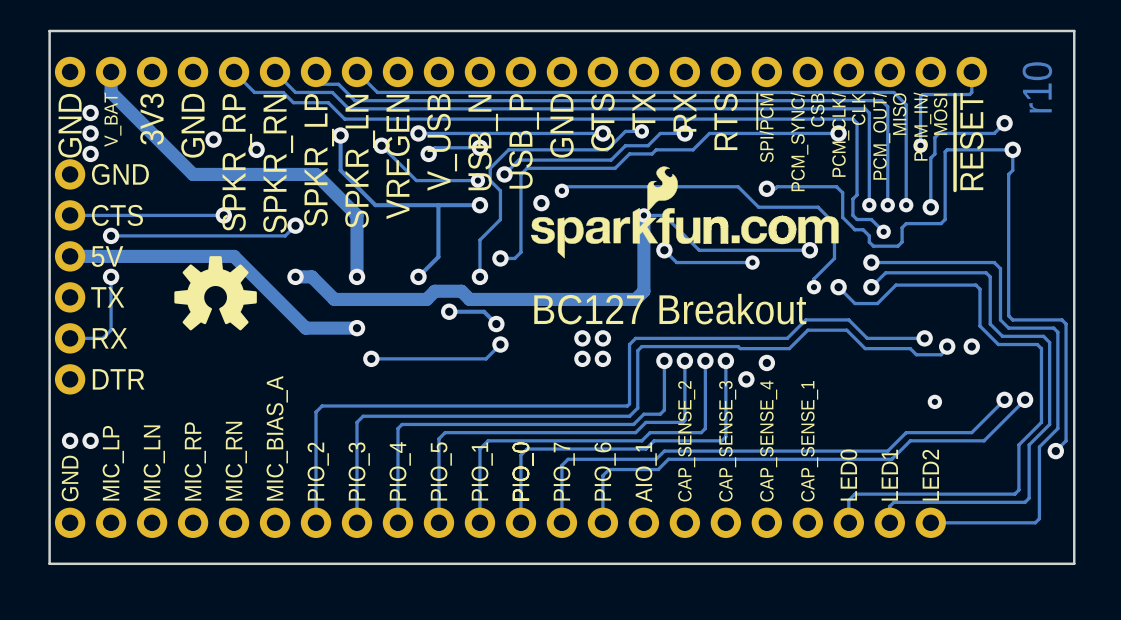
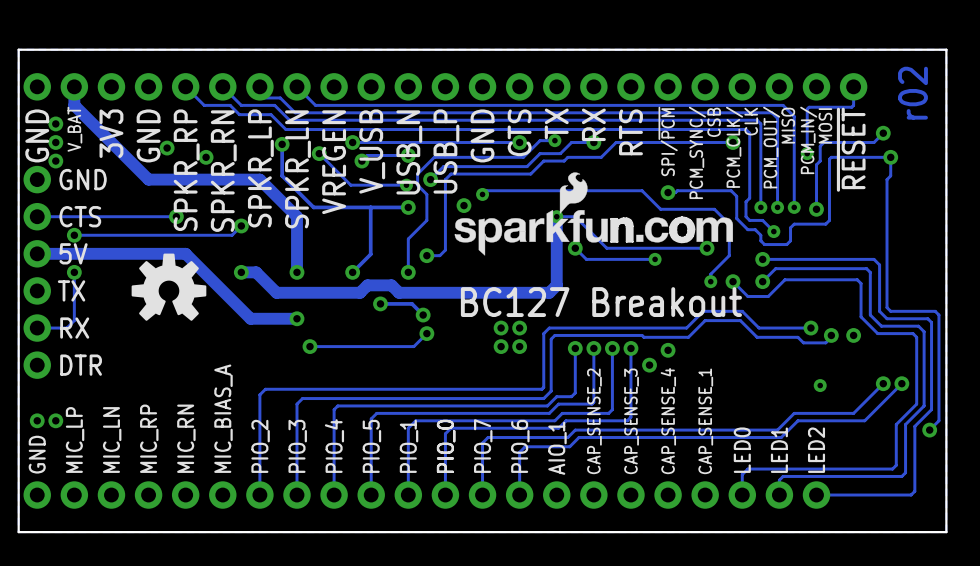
text: r10 (1037, 87) -> r02 (912, 93)

